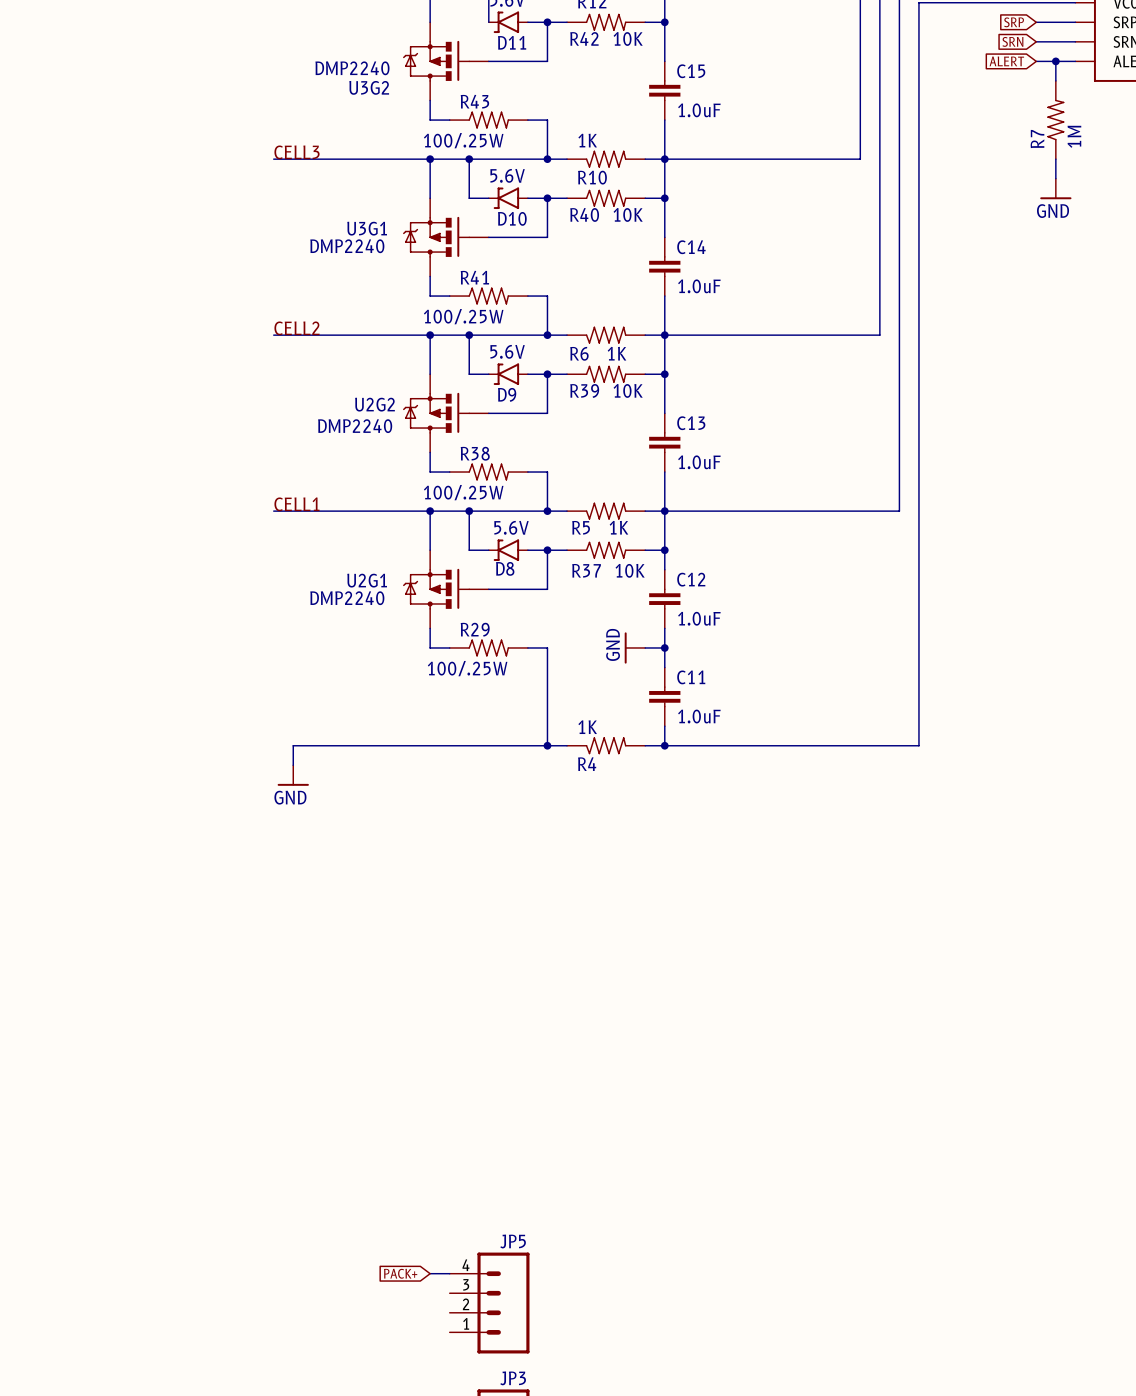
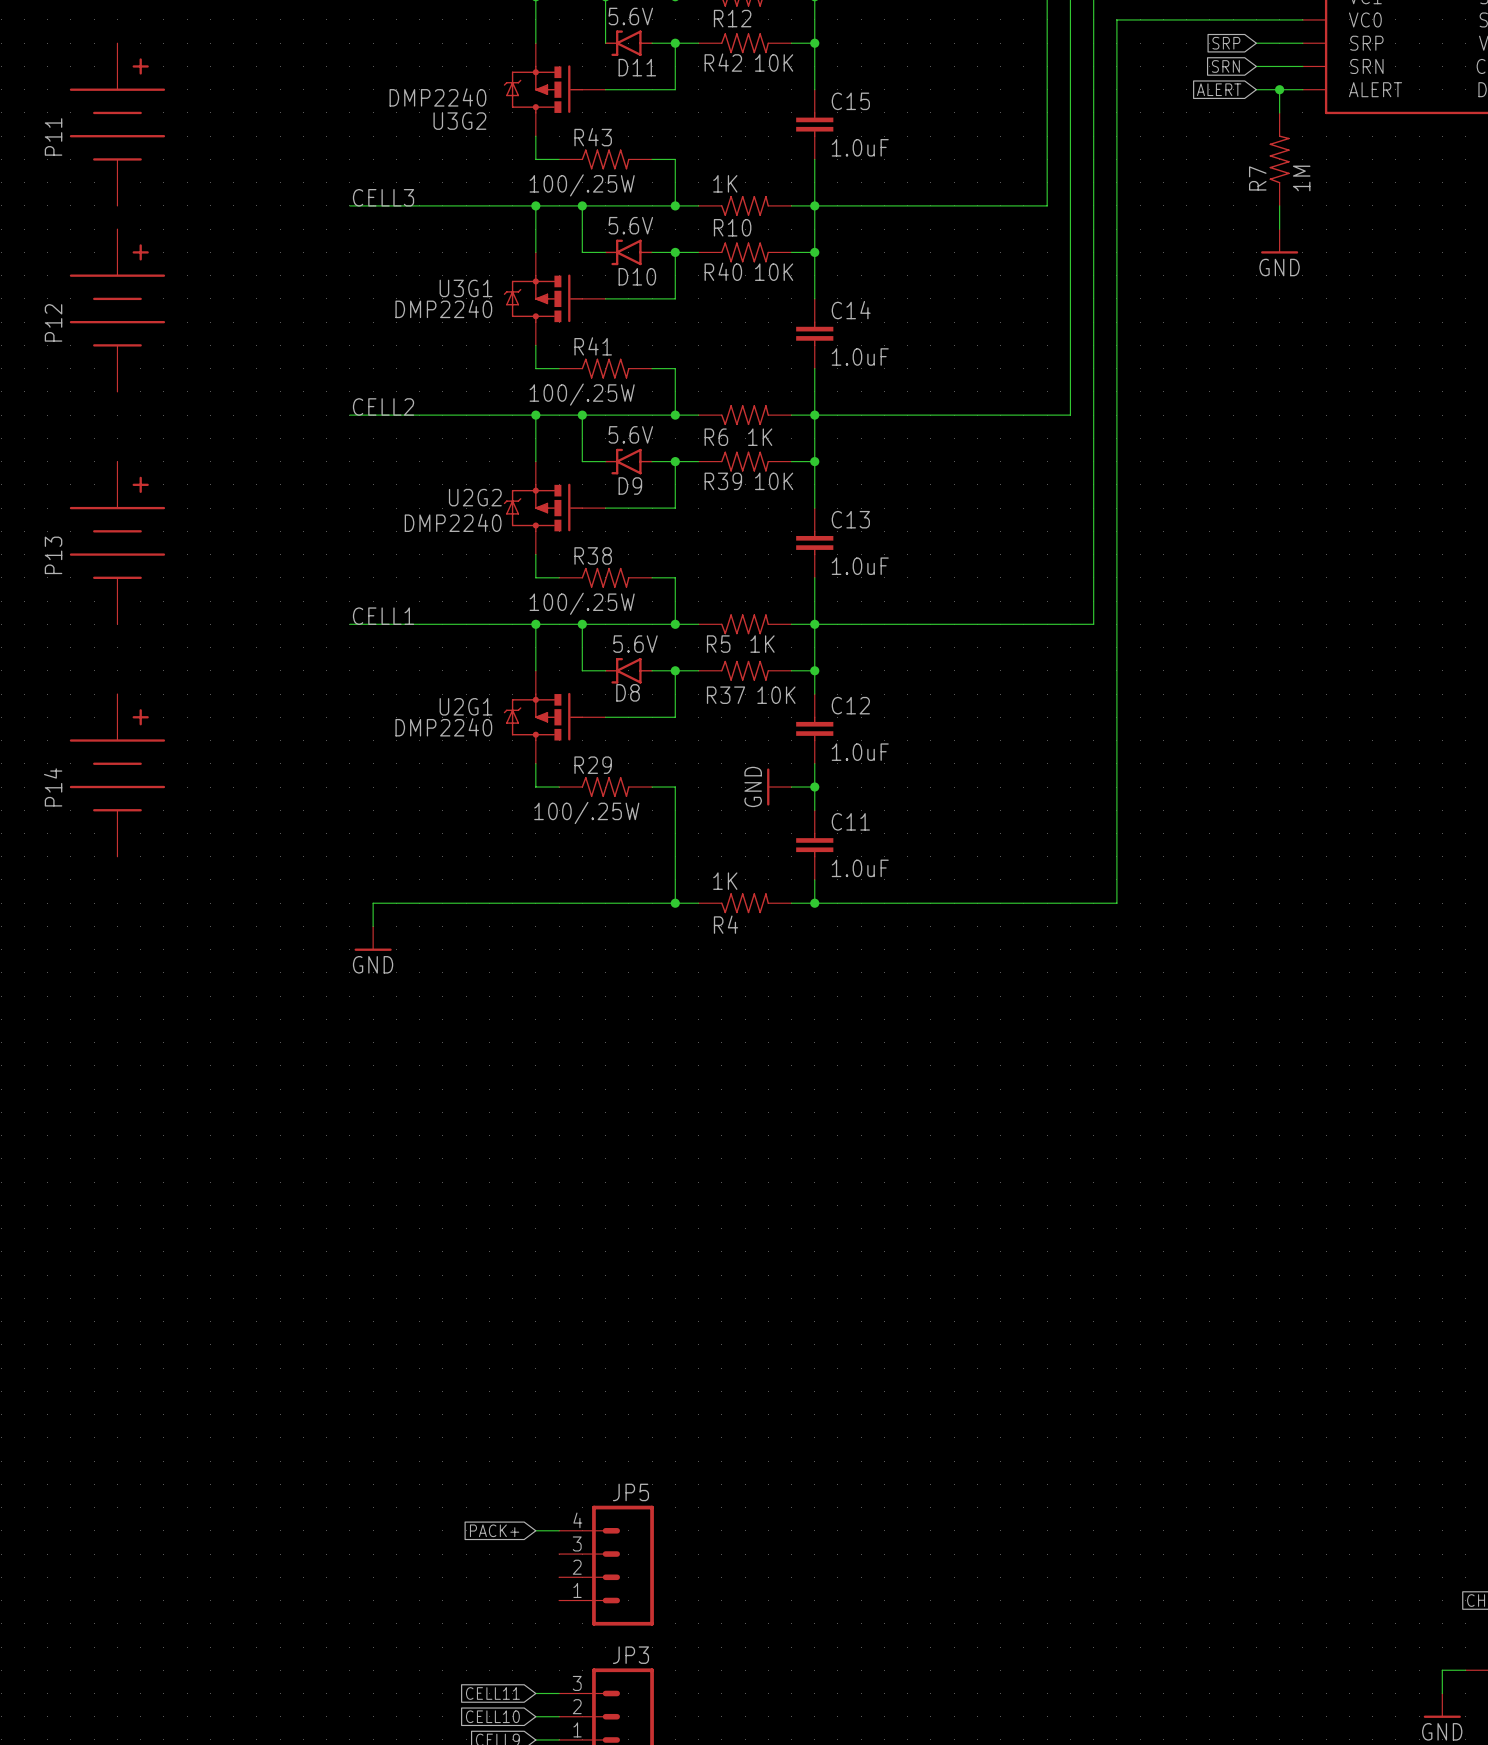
P11: none -> (117, 124)
P12: none -> (117, 310)
P13: none -> (117, 542)
P14: none -> (117, 775)

